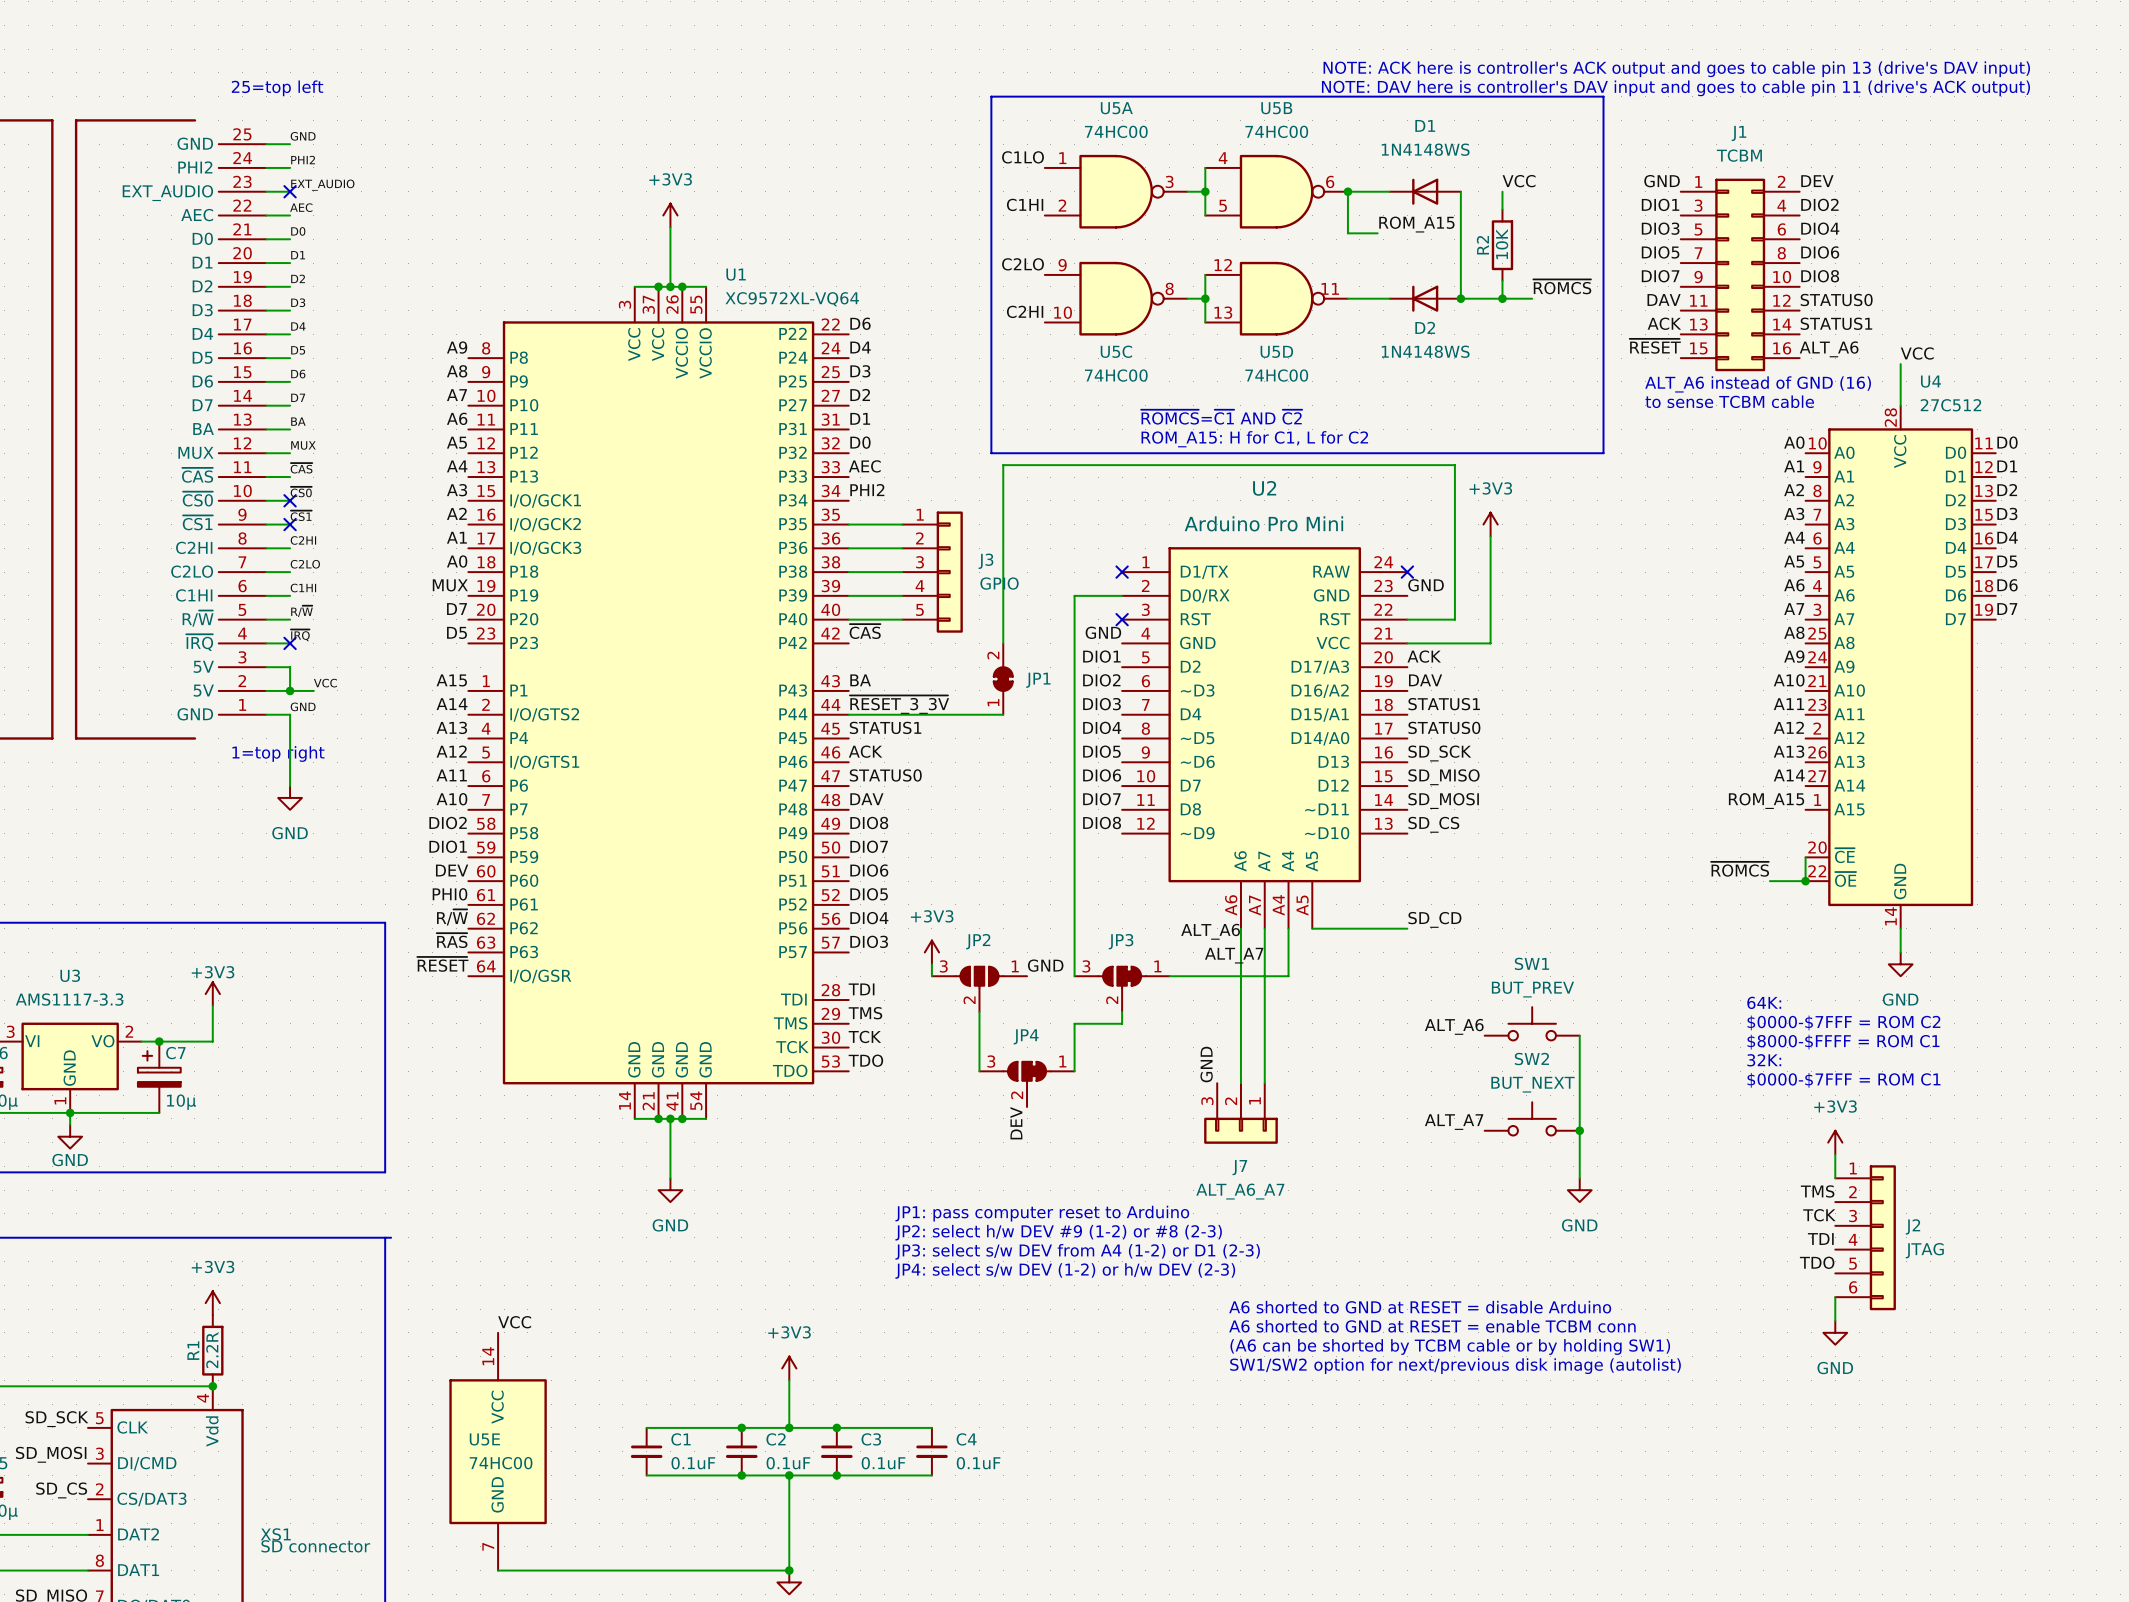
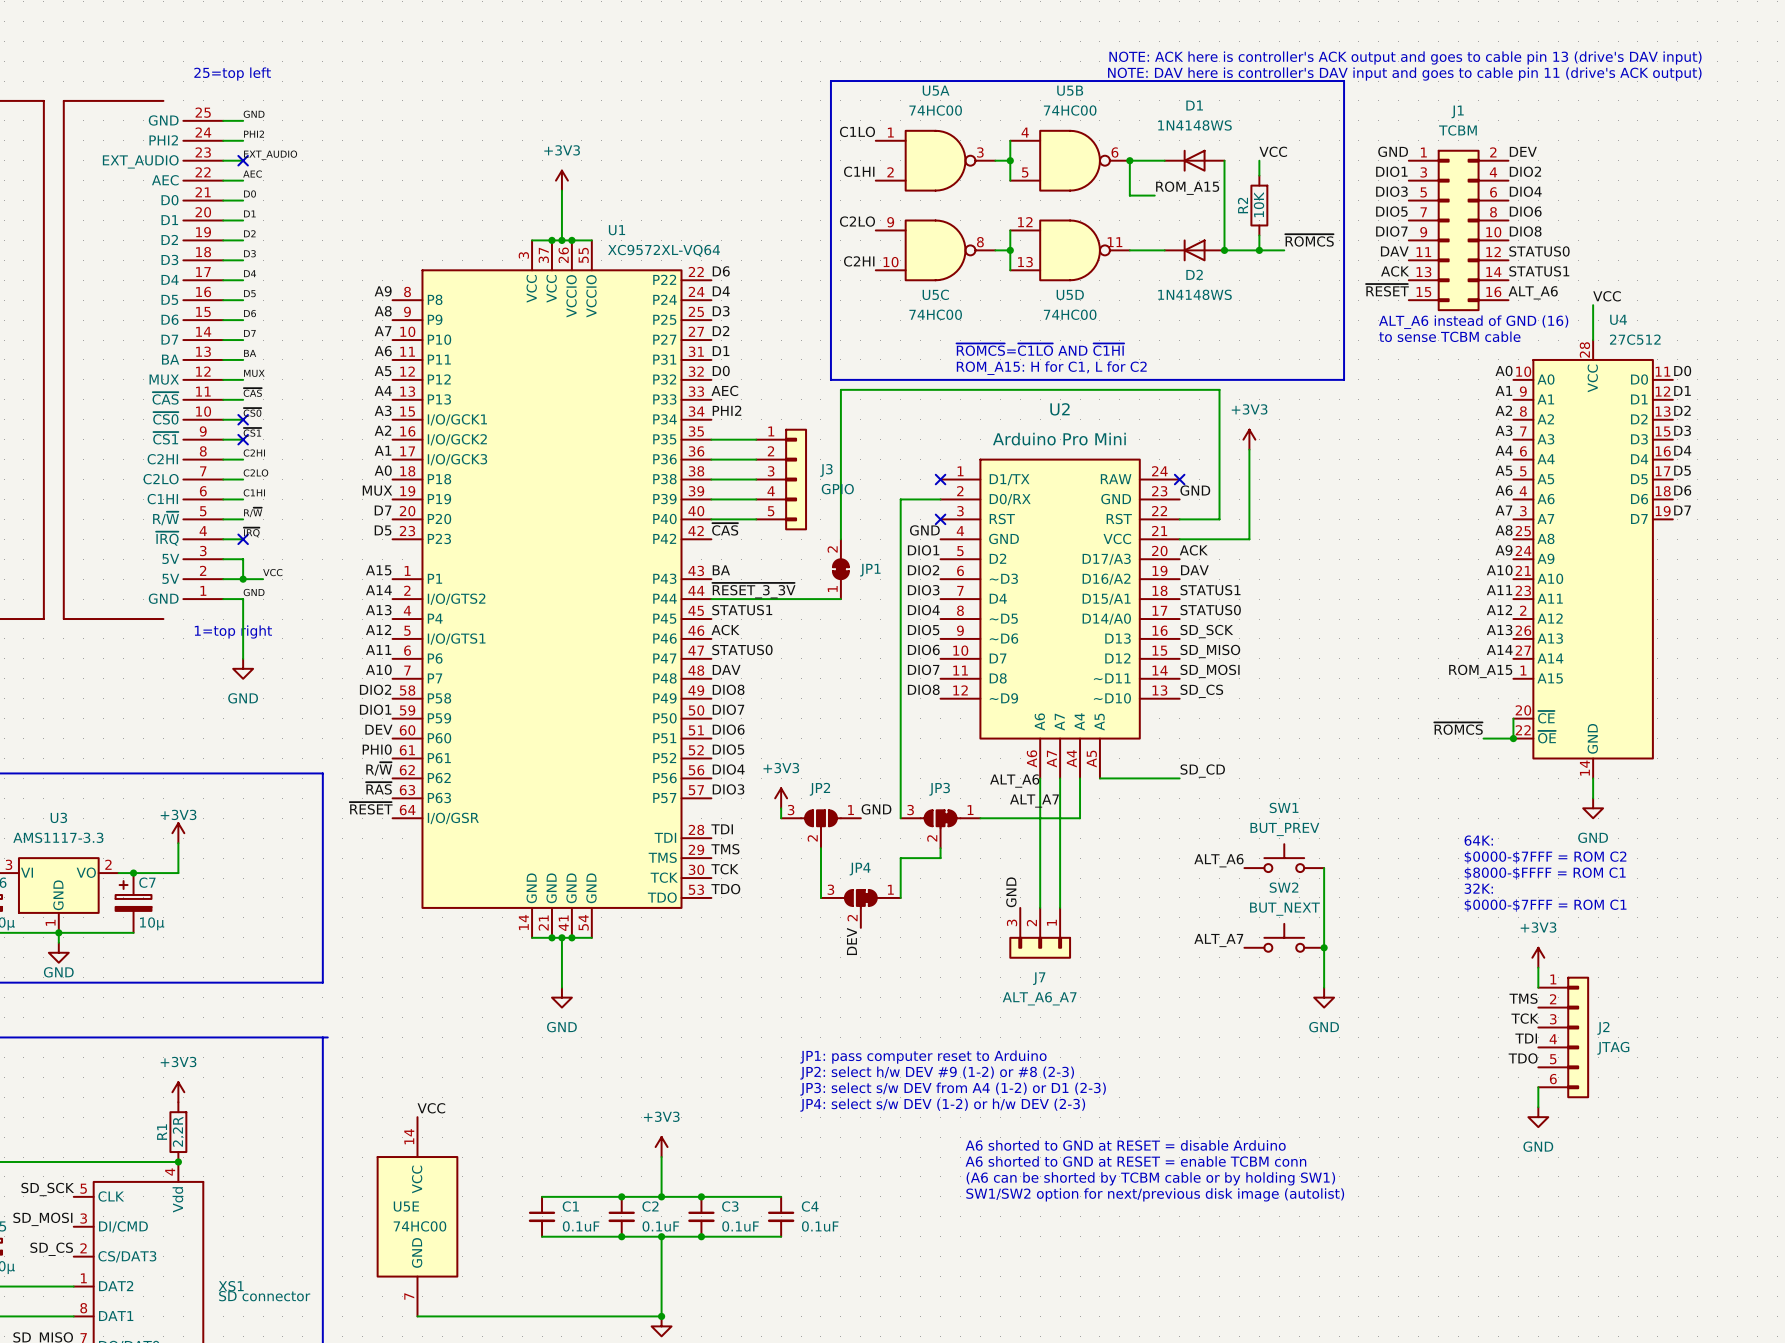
text: ~{ROMCS}=~{C1} AND ~{C2} (1221, 417) -> ~{ROMCS}=~{C1LO} AND ~{C1HI} (1040, 349)
text position: JP1: pass computer reset to Arduino (1042, 1213) -> JP1: pass computer reset to Arduino (923, 1057)
text position: JP2: select h/w DEV #9 (1-2) or #8 (2-3) (1058, 1232) -> JP2: select h/w DEV #9 (1-2) or #8 (2-3) (937, 1073)
text position: JP3: select s/w DEV from A4 (1-2) or D1 (2-3) (1077, 1251) -> JP3: select s/w DEV from A4 (1-2) or D1 (2-3) (953, 1089)
text position: JP4: select s/w DEV (1-2) or h/w DEV (2-3) (1065, 1270) -> JP4: select s/w DEV (1-2) or h/w DEV (2-3) (942, 1105)
text position: A6 shorted to GND at RESET = disable Arduino (1420, 1307) -> A6 shorted to GND at RESET = disable Arduino (1125, 1145)
text position: A6 shorted to GND at RESET = enable TCBM conn (1432, 1326) -> A6 shorted to GND at RESET = enable TCBM conn (1135, 1161)
text position: (A6 can be shorted by TCBM cable or by holding SW1) (1450, 1346) -> (A6 can be shorted by TCBM cable or by holding SW1) (1150, 1178)
text position: SW1/SW2 option for next/previous disk image (autolist) (1455, 1366) -> SW1/SW2 option for next/previous disk image (autolist) (1155, 1194)

